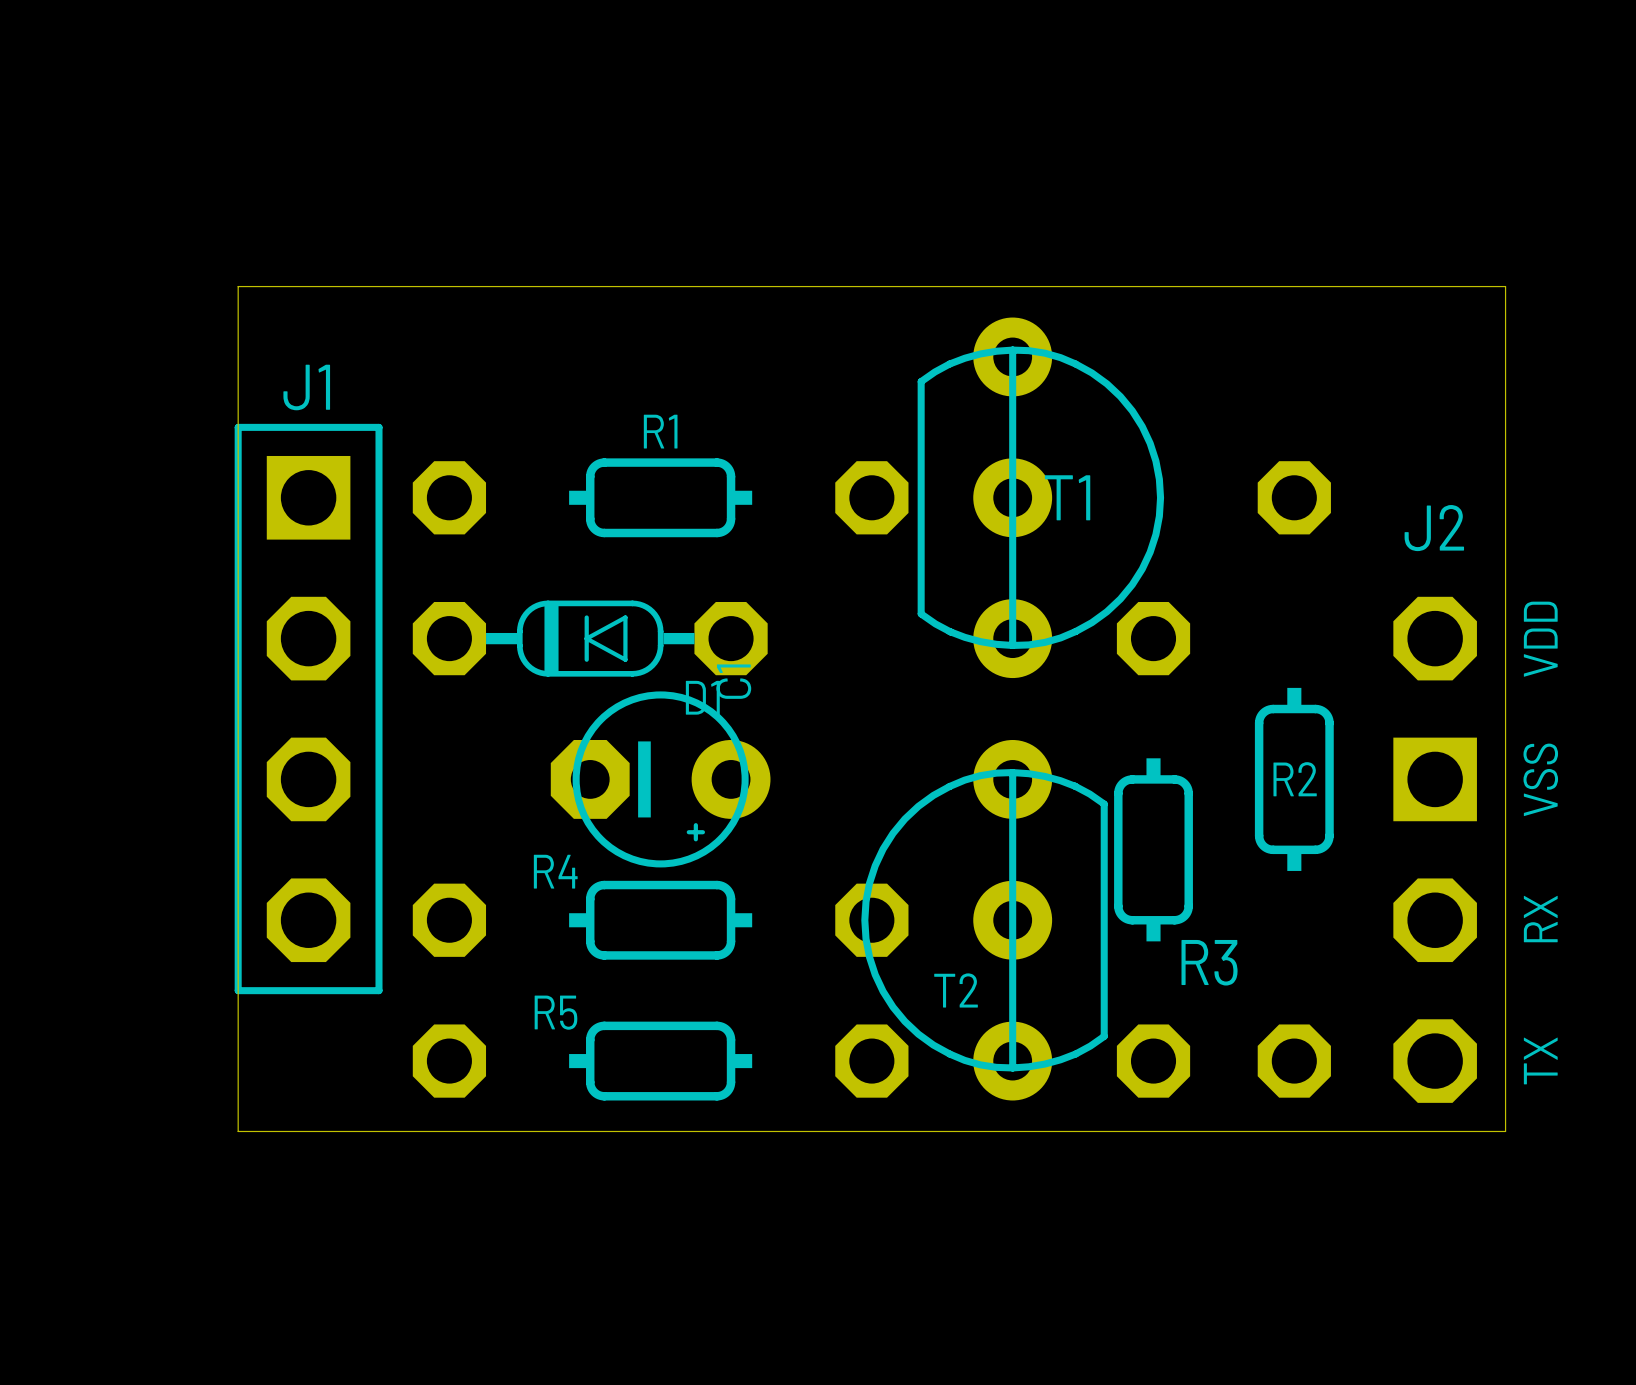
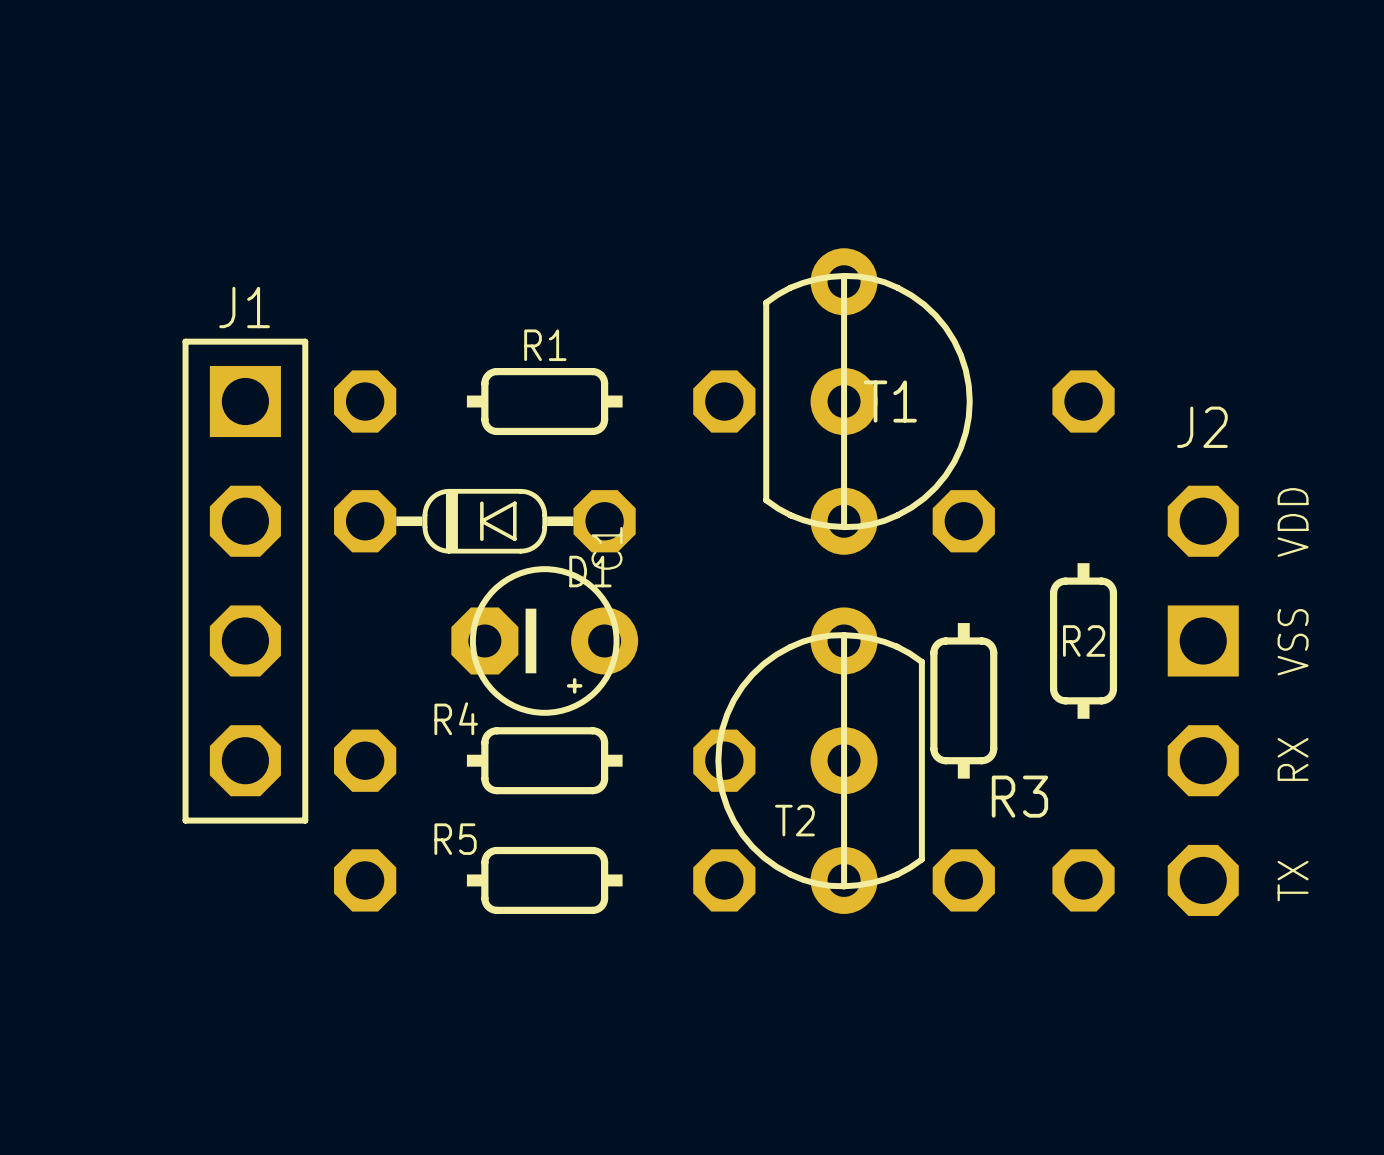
board edge: (238, 286) (1505, 286) (1505, 1131) (238, 1131) (238, 286) -> none

